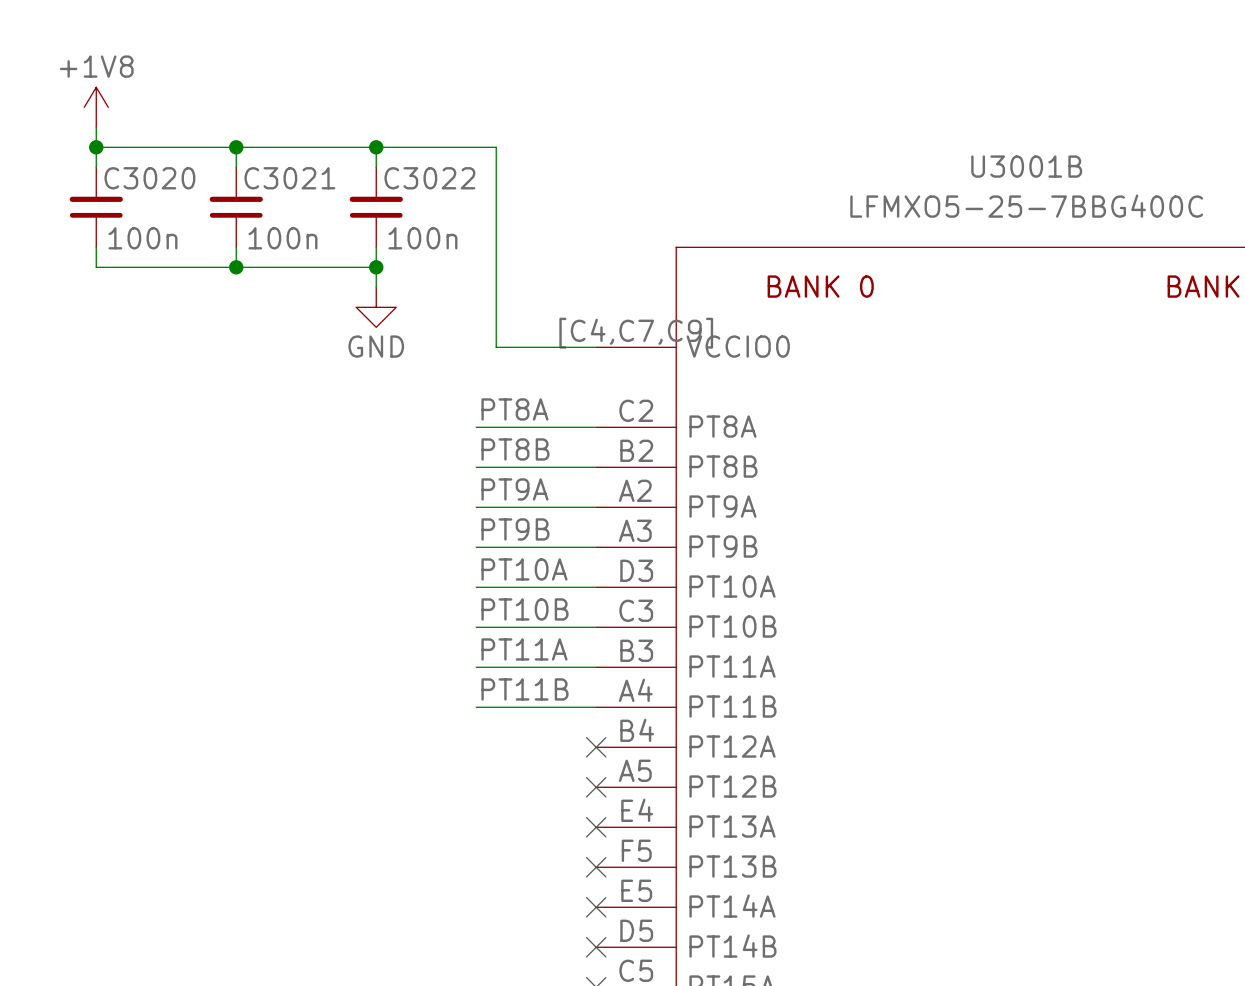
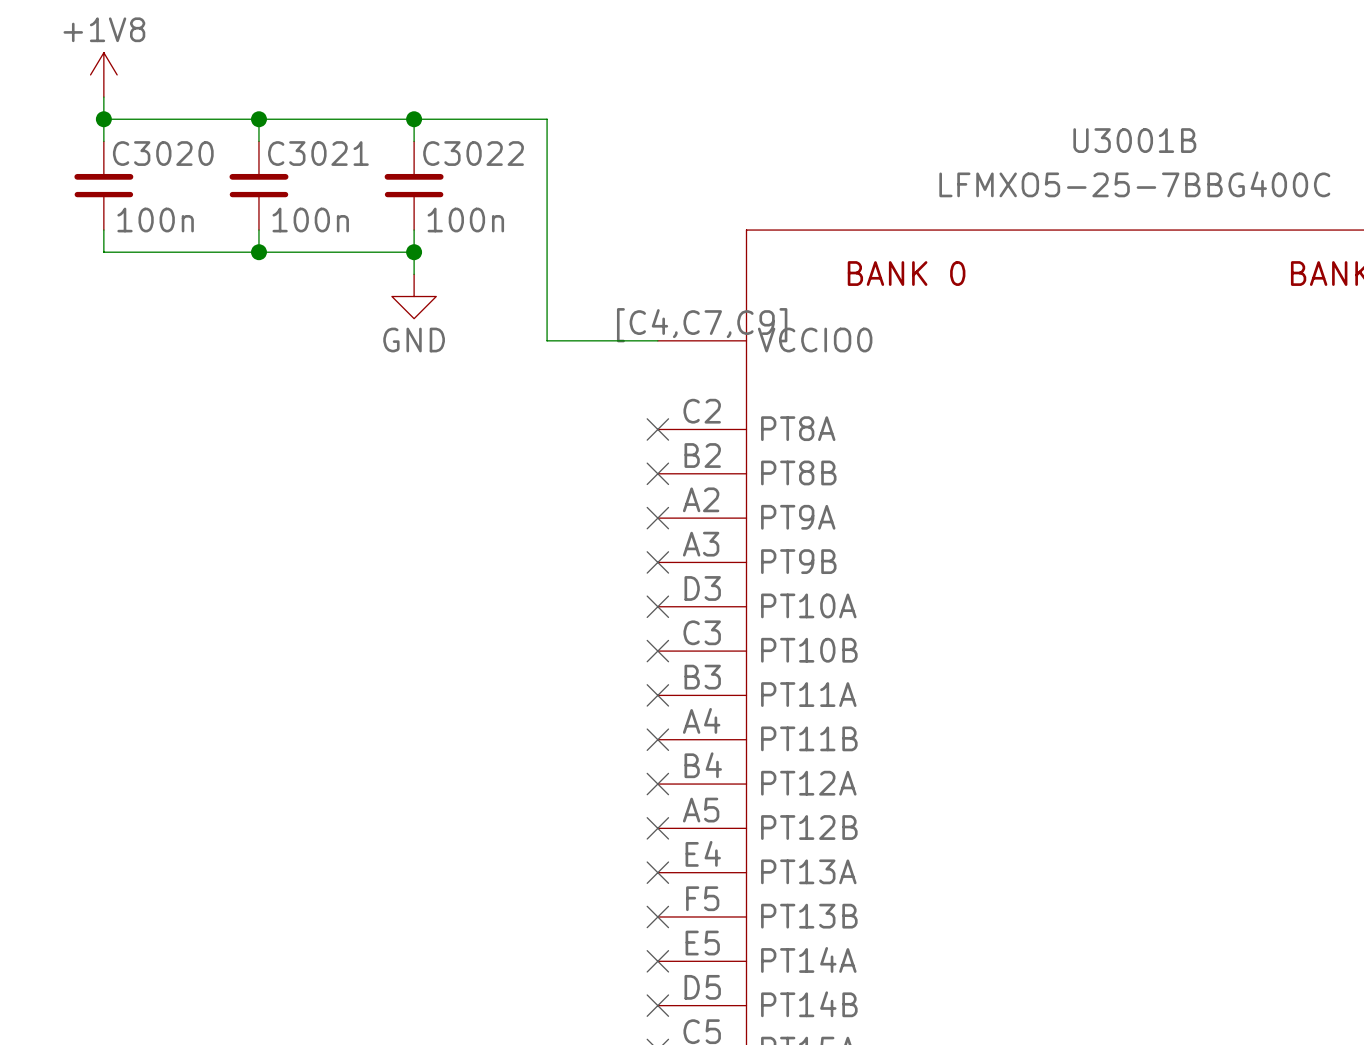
label: PT8A (514, 409) -> none
wire: (476, 427) (596, 427) -> none
no-connect mark: none -> (657, 429)
label: PT8B (515, 449) -> none
wire: (476, 467) (596, 467) -> none
no-connect mark: none -> (657, 473)
label: PT9A (514, 489) -> none
wire: (476, 507) (596, 507) -> none
no-connect mark: none -> (657, 518)
label: PT9B (515, 529) -> none
wire: (476, 547) (596, 547) -> none
no-connect mark: none -> (657, 562)
label: PT10A (524, 569) -> none
wire: (476, 587) (596, 587) -> none
no-connect mark: none -> (657, 606)
label: PT10B (524, 609) -> none
wire: (476, 627) (596, 627) -> none
no-connect mark: none -> (657, 651)
label: PT11A (524, 649) -> none
wire: (476, 667) (596, 667) -> none
no-connect mark: none -> (657, 695)
label: PT11B (524, 689) -> none
wire: (476, 707) (596, 707) -> none
no-connect mark: none -> (657, 739)

